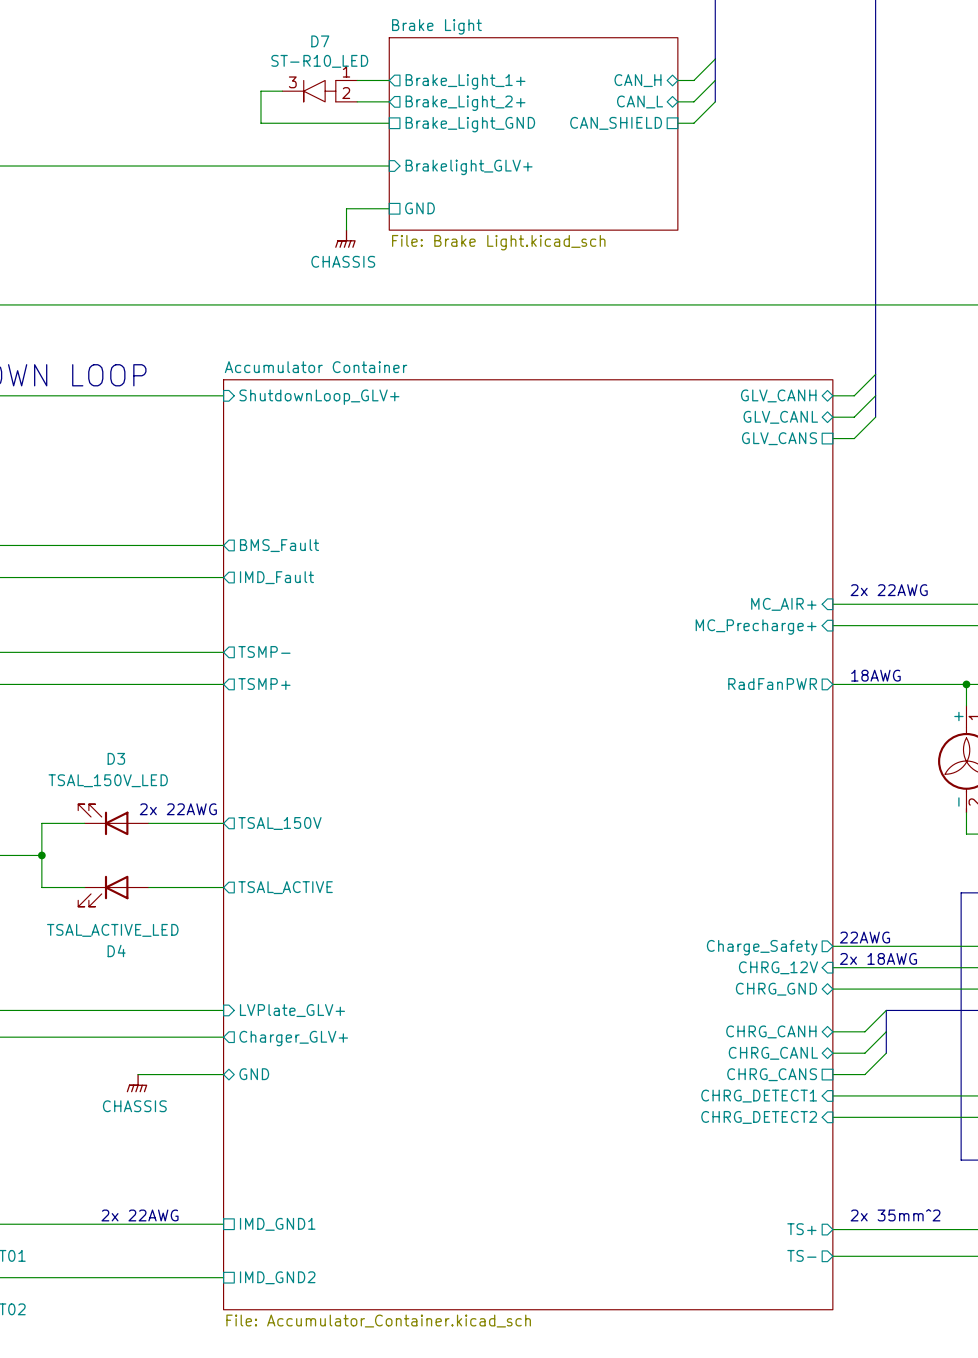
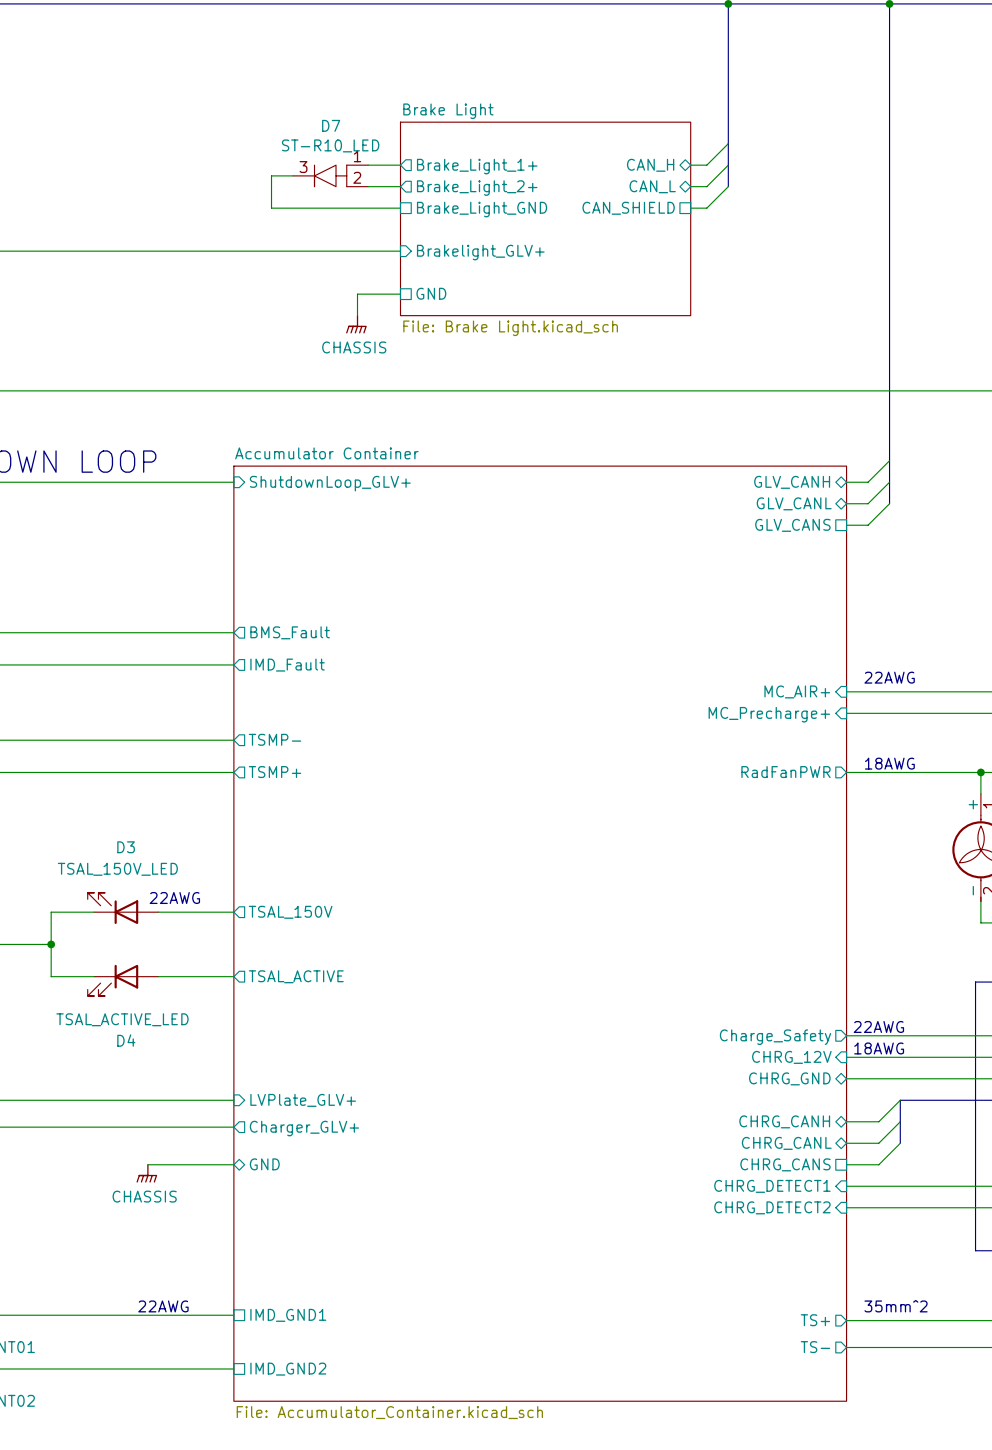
text: 2x 22AWG (889, 590) -> 22AWG (889, 677)
text: 2x 22AWG (178, 809) -> 22AWG (174, 898)
text: 2x 18AWG (878, 958) -> 18AWG (879, 1048)
text: 2x 22AWG (140, 1215) -> 22AWG (163, 1306)
text: 2x 35mm^2 (895, 1215) -> 35mm^2 (896, 1306)

